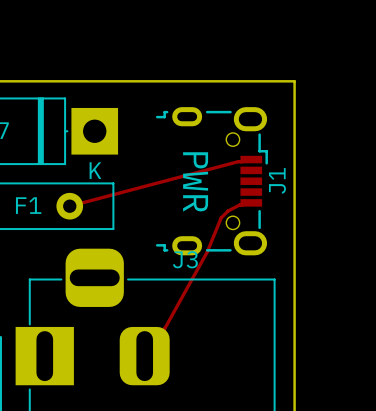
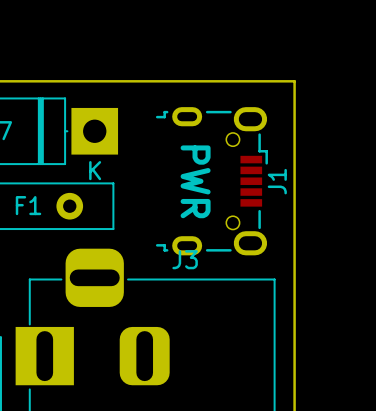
track: (251, 159) (69, 206) -> none
track: (251, 202) (239, 204) (228, 211) (221, 217) (207, 251) (164, 329) -> none

